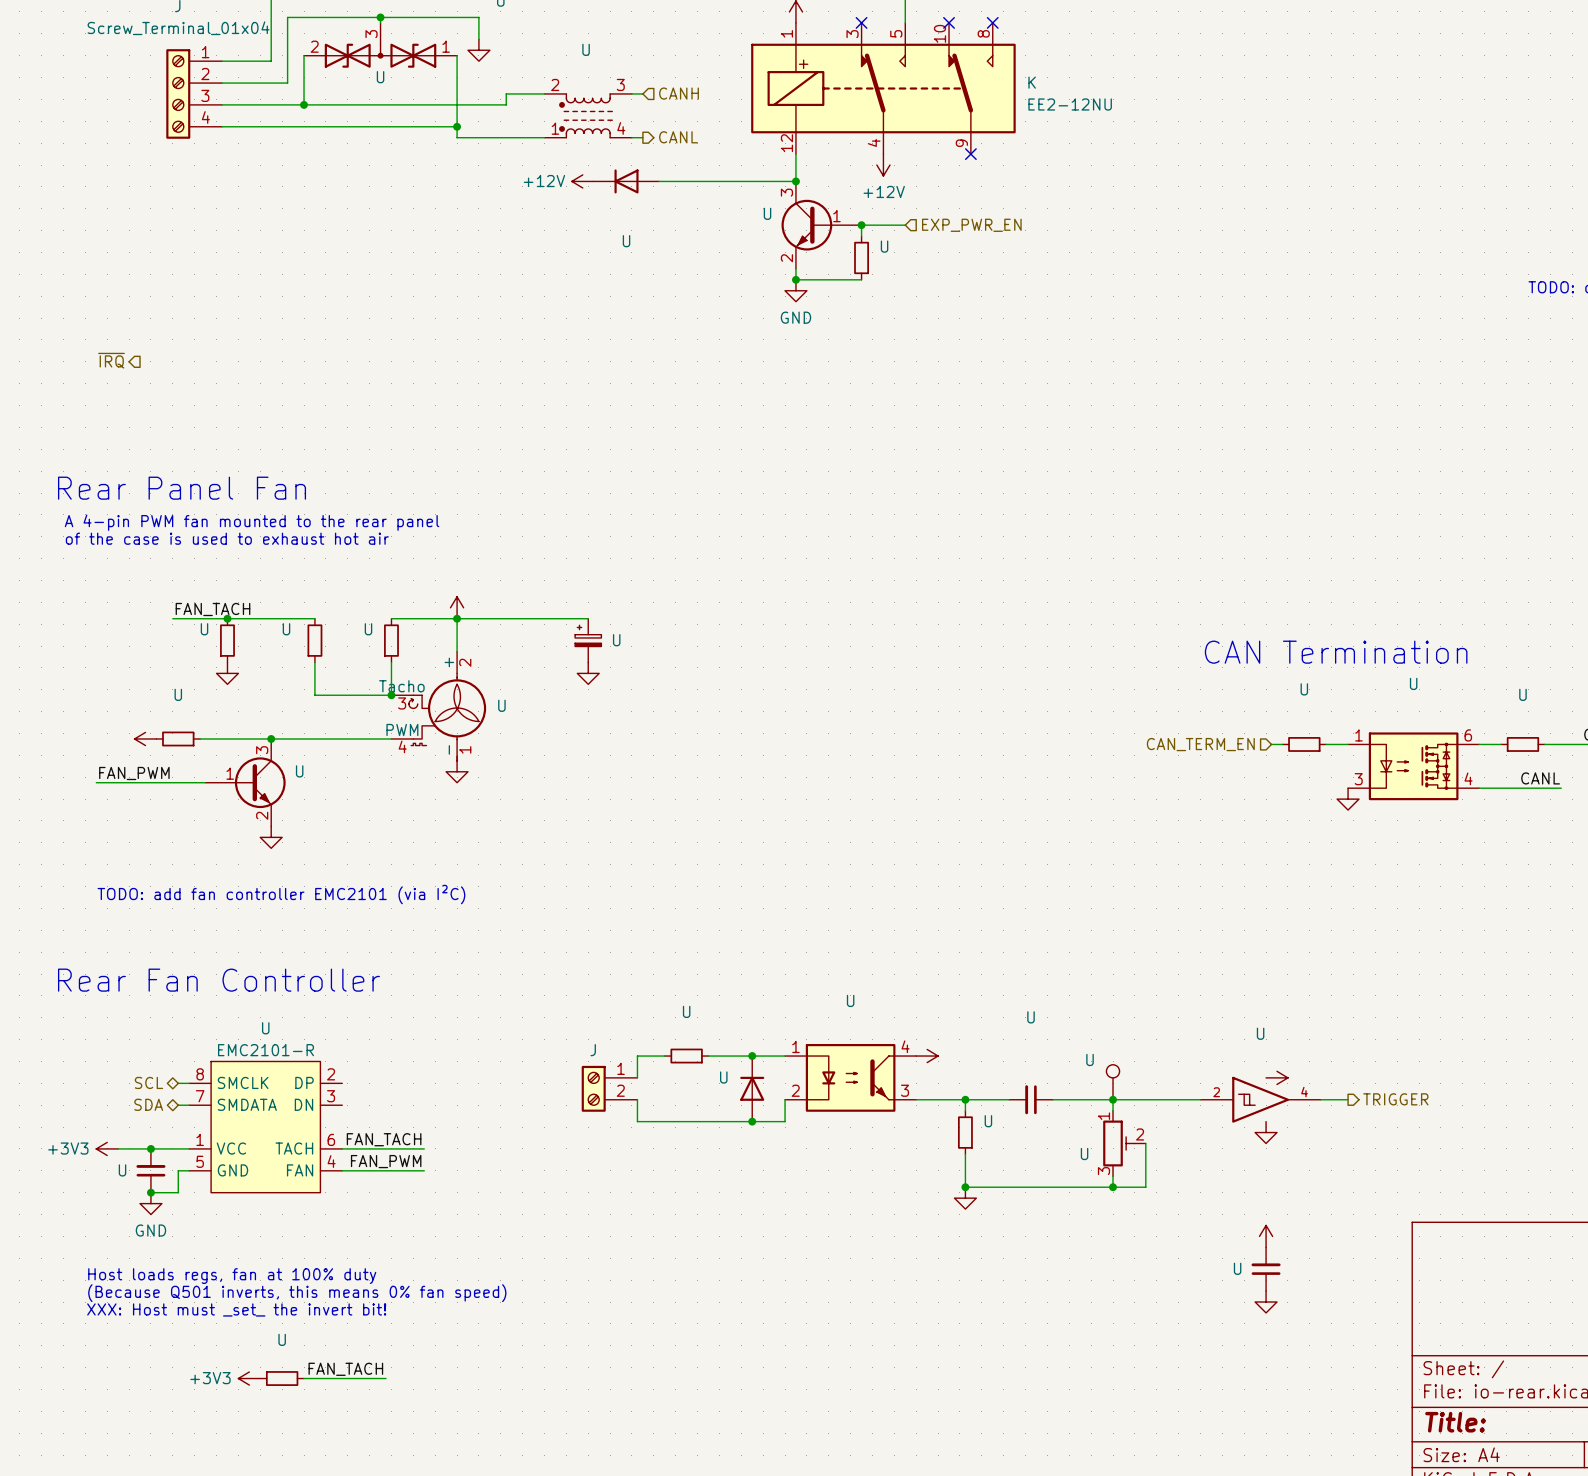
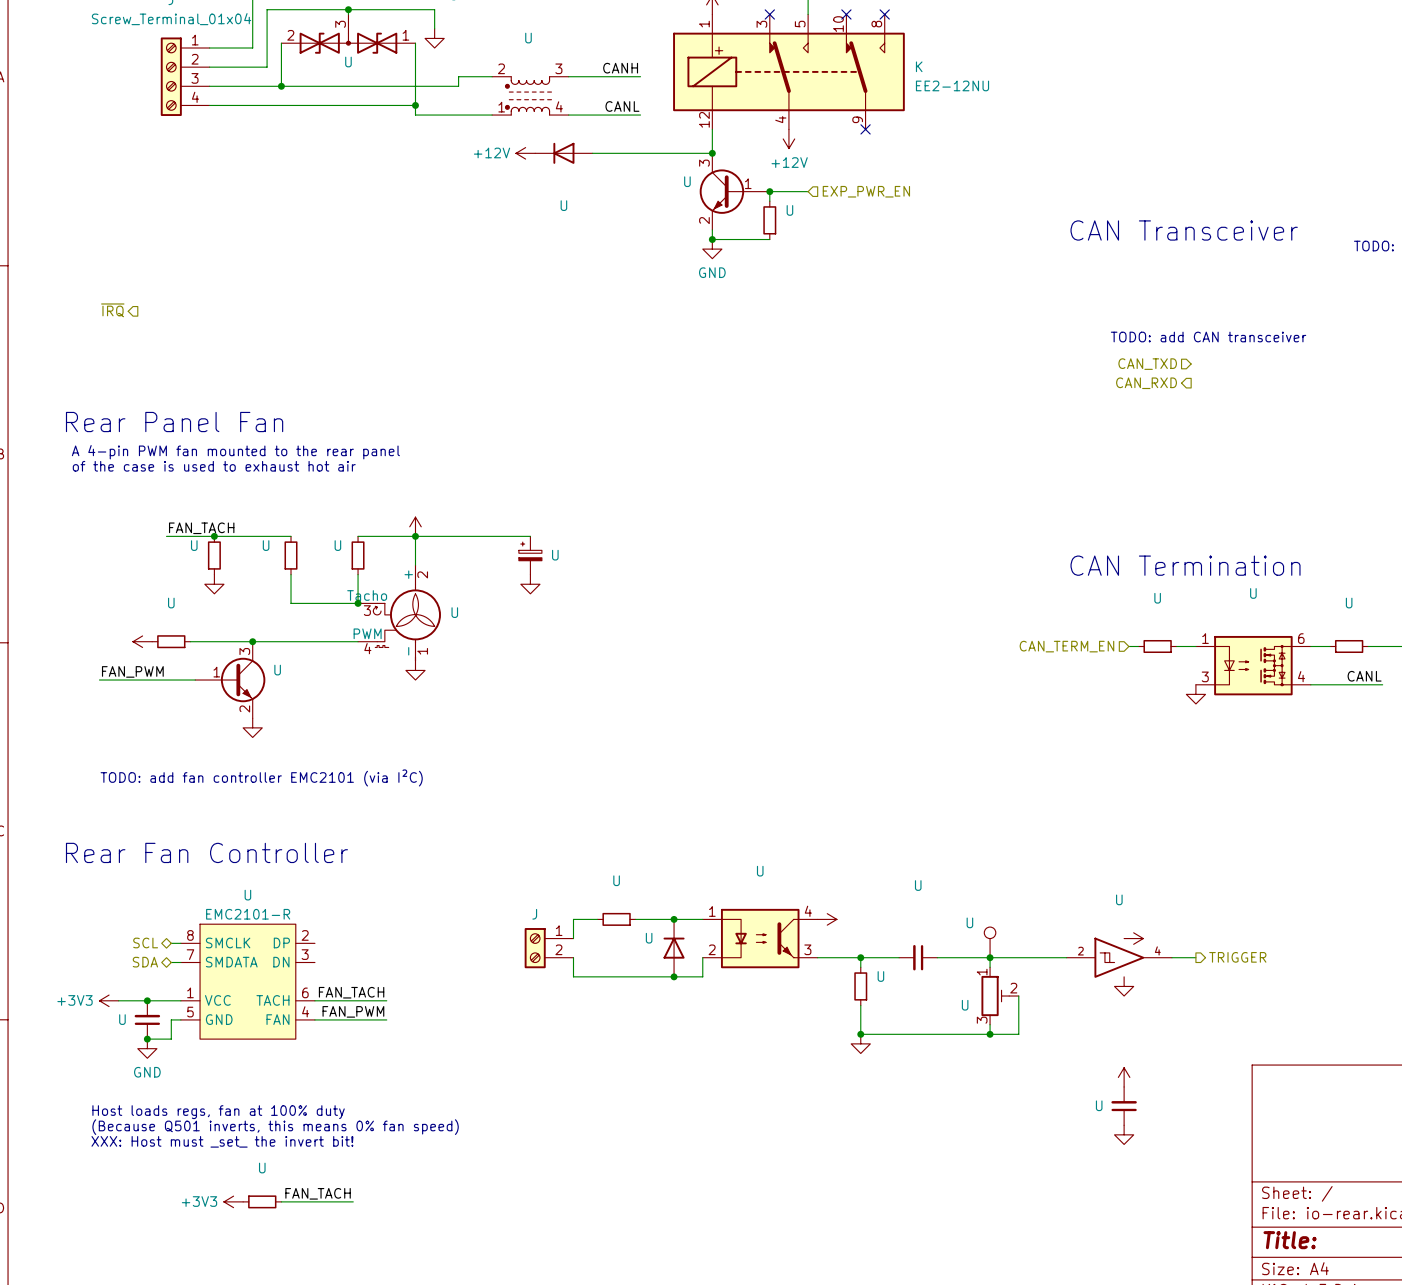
label: none -> CANH (620, 68)
wire: none -> (578, 76) (640, 76)
hierarchical label: CANH (679, 93) -> none
label: none -> CANL (622, 106)
wire: none -> (578, 115) (640, 115)
hierarchical label: CANL (678, 137) -> none
text: none -> CAN Transceiver (1184, 230)
text: none -> TODO: add CAN transceiver (1208, 337)
hierarchical label: none -> CAN_TXD (1147, 364)
hierarchical label: none -> CAN_RXD (1146, 383)

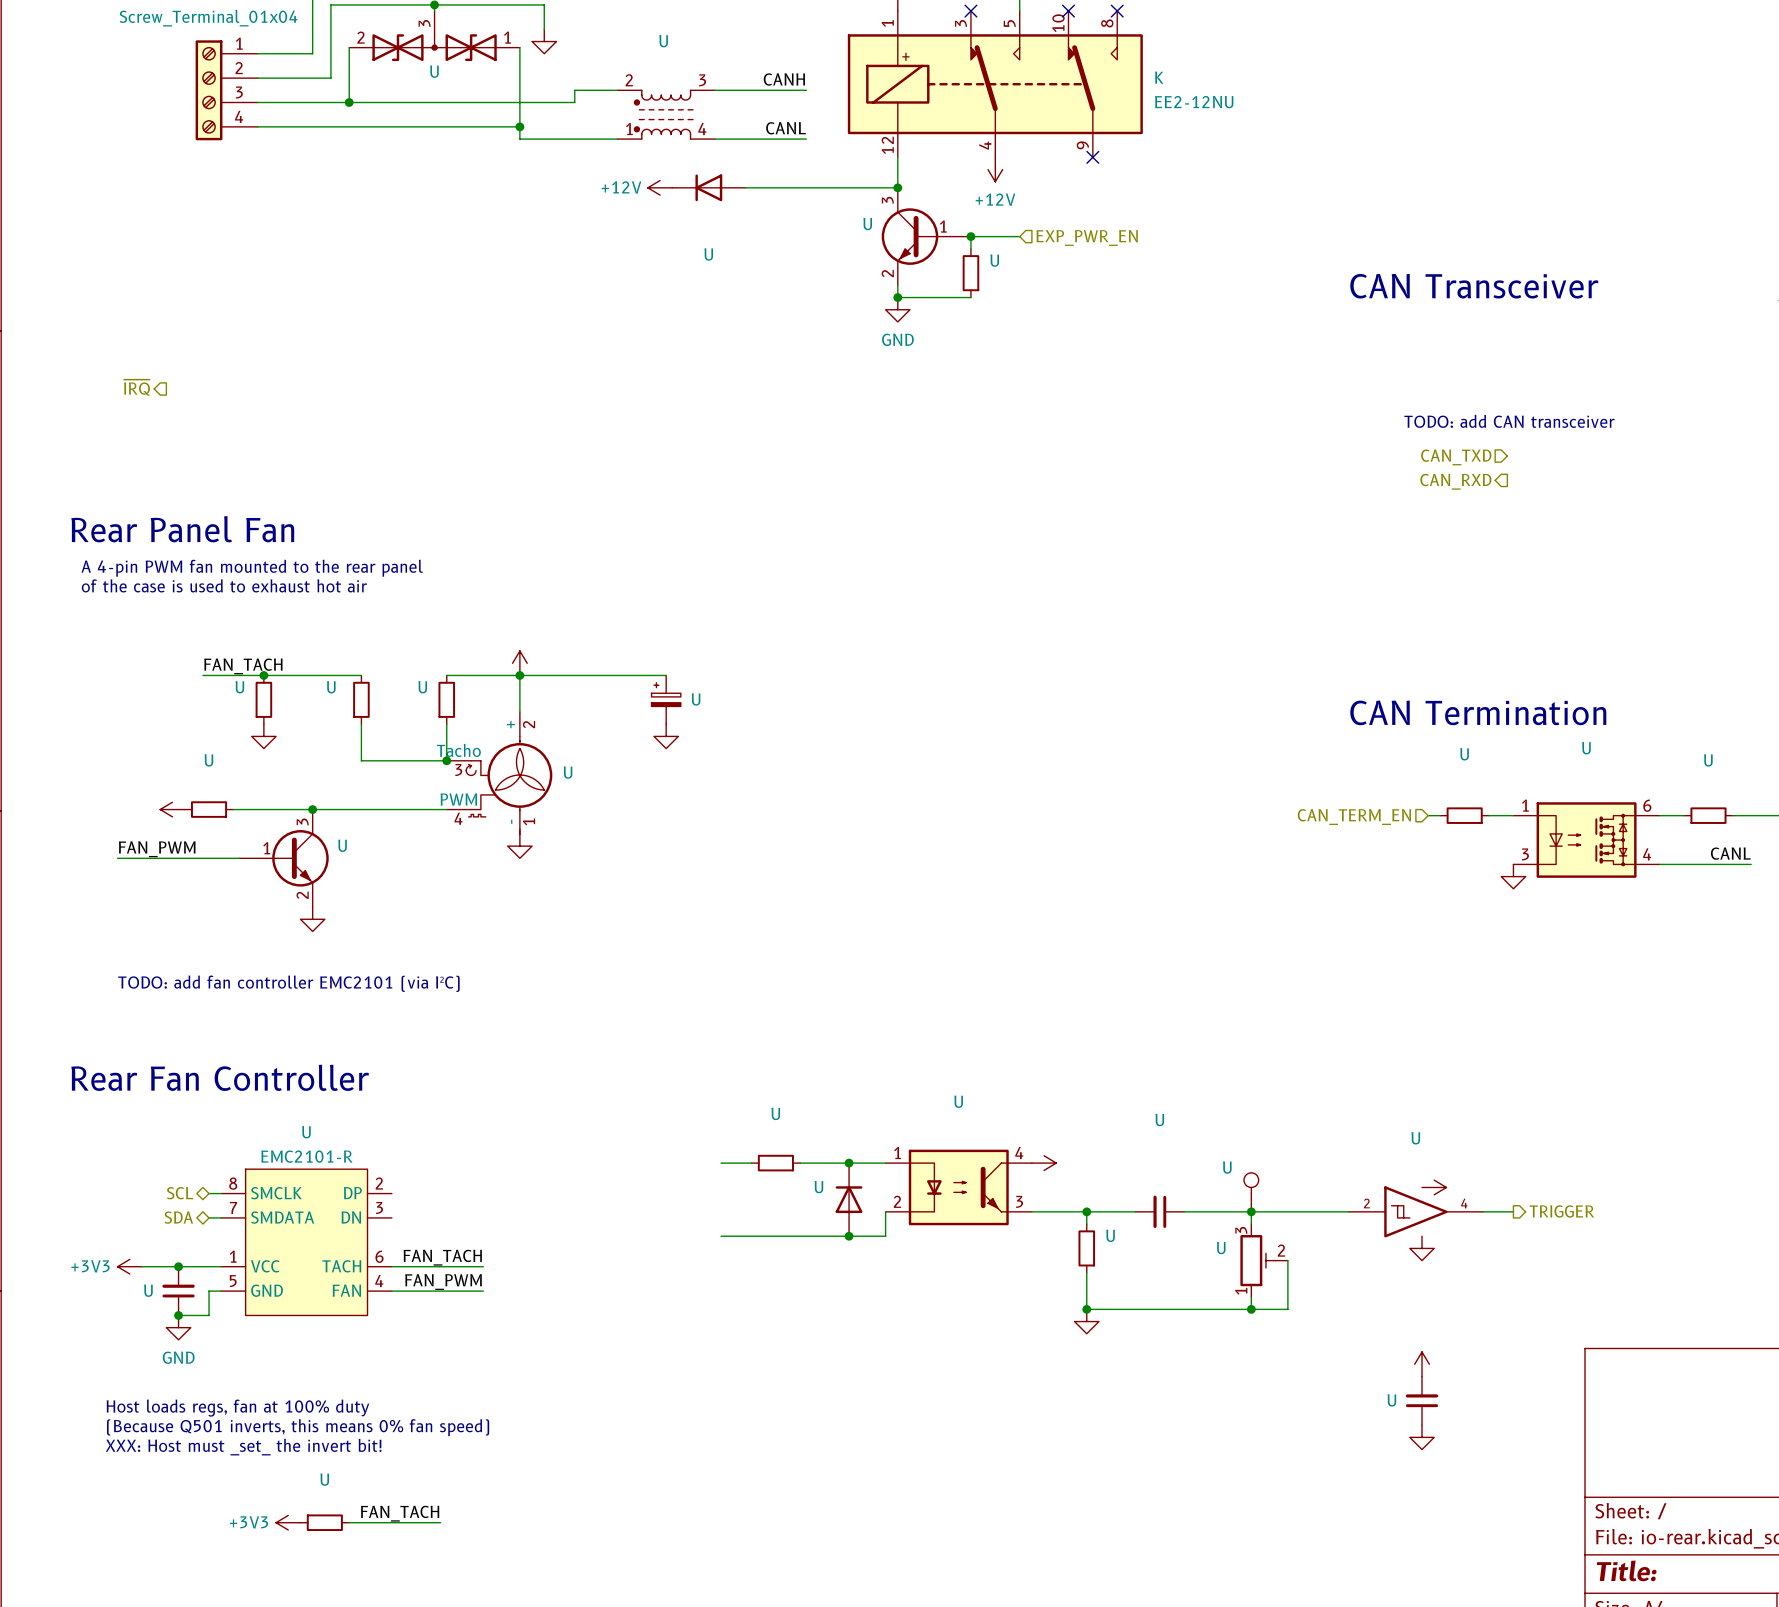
wire: (573, 919) (573, 938) -> none
J: (549, 948) -> none
wire: (573, 957) (573, 976) -> none
U flip: as is (995, 996) -> up-down (1258, 1260)

